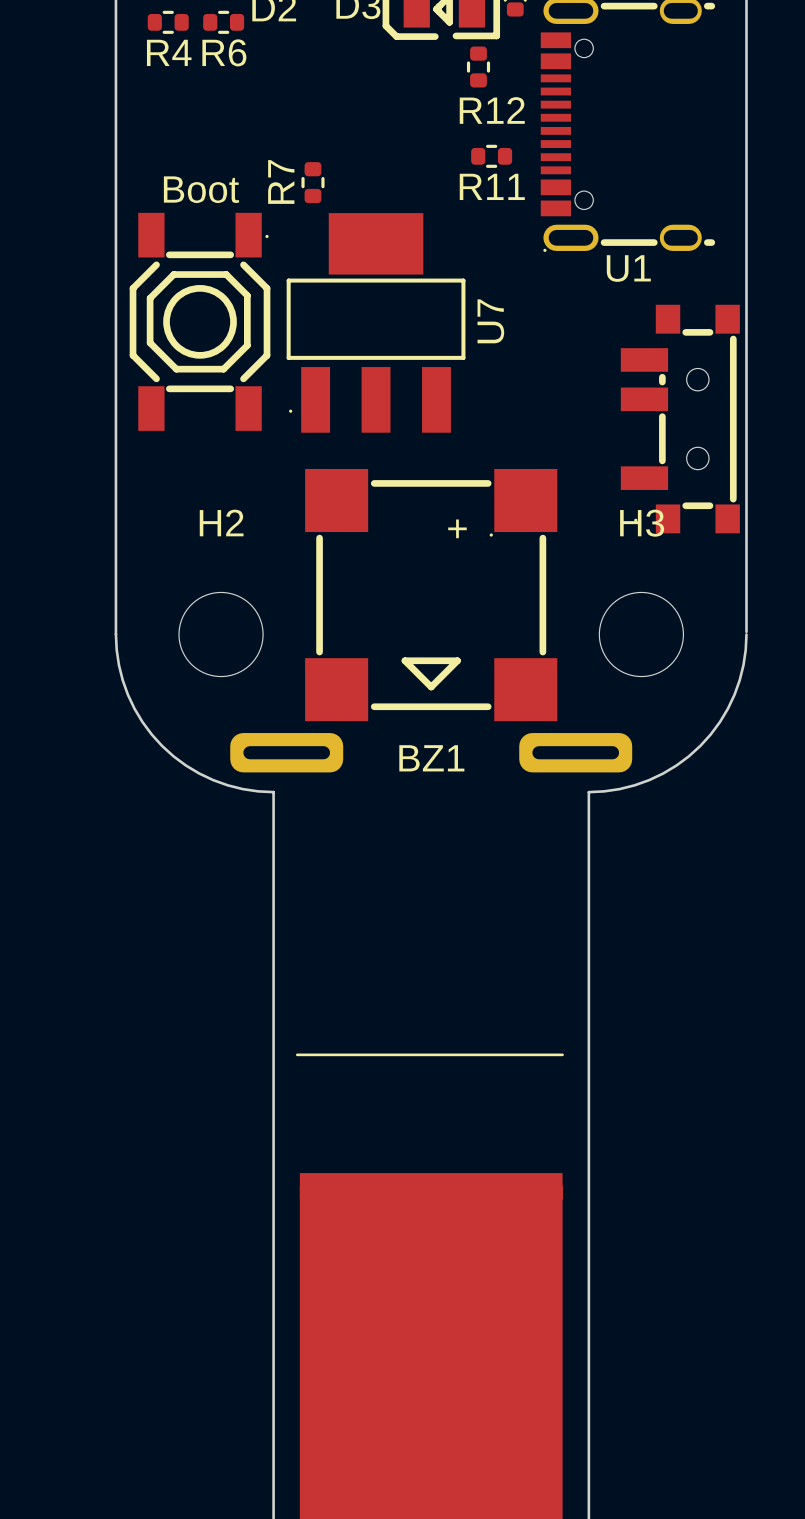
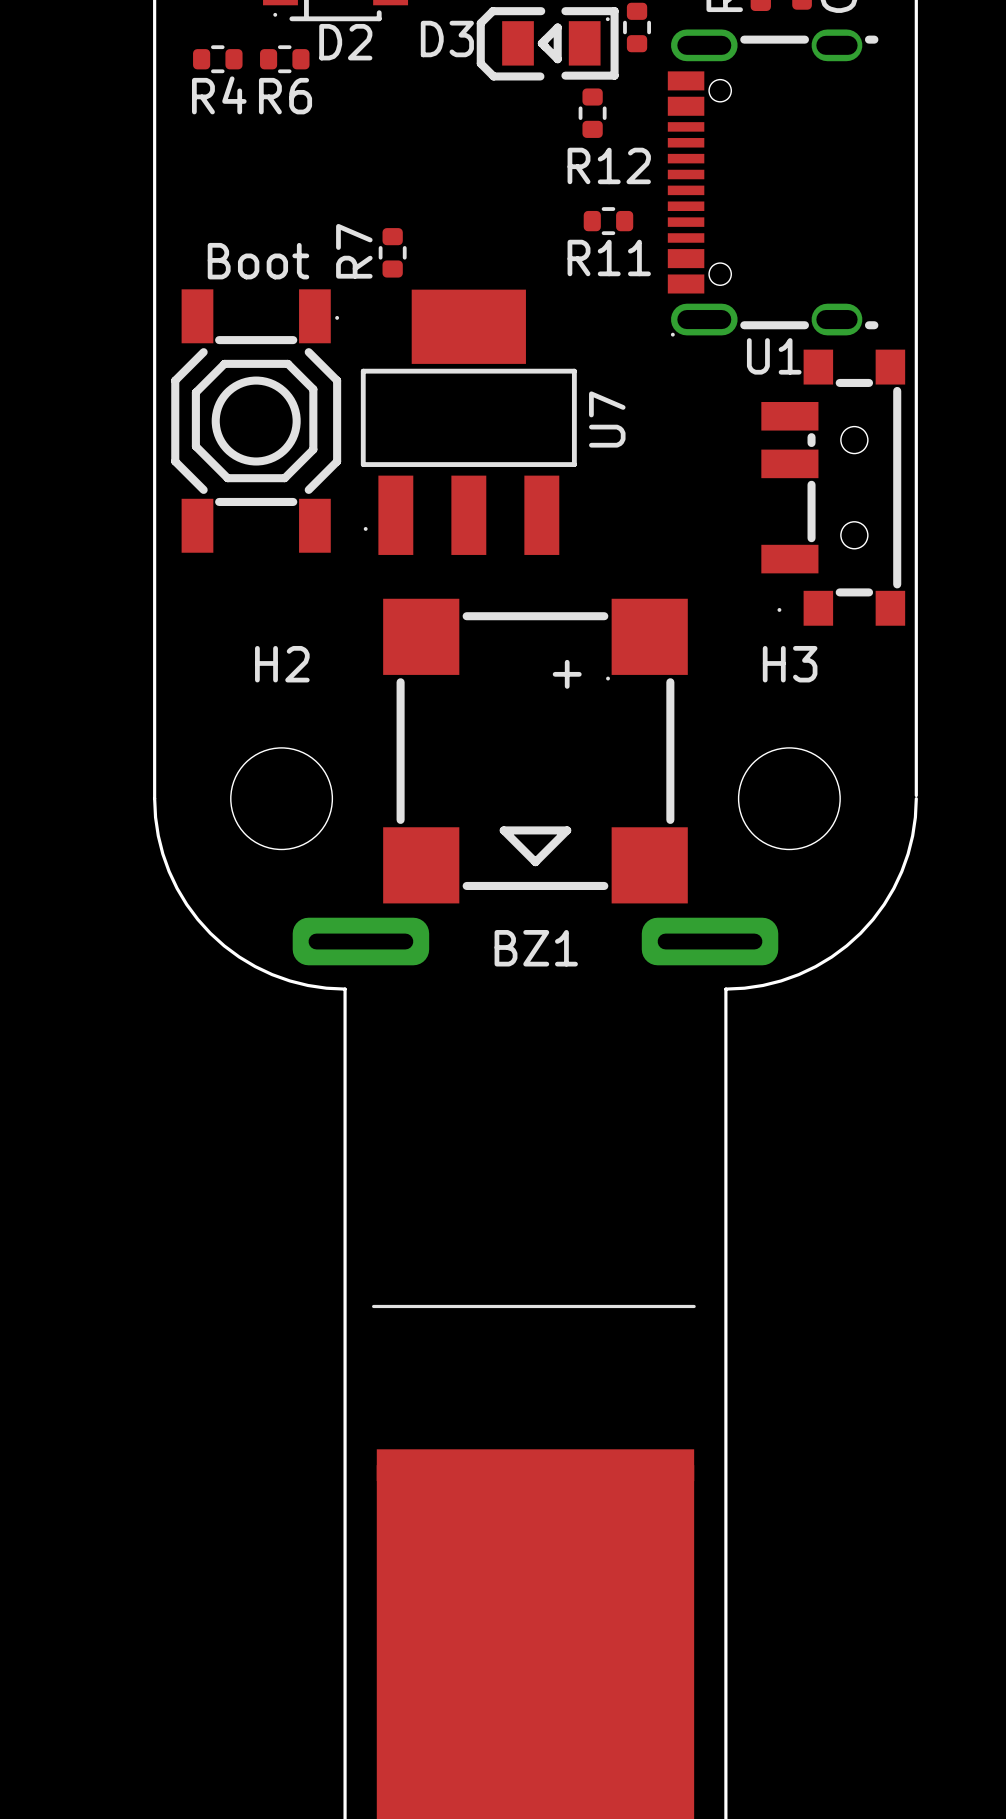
part position: (680, 419) -> (833, 487)

